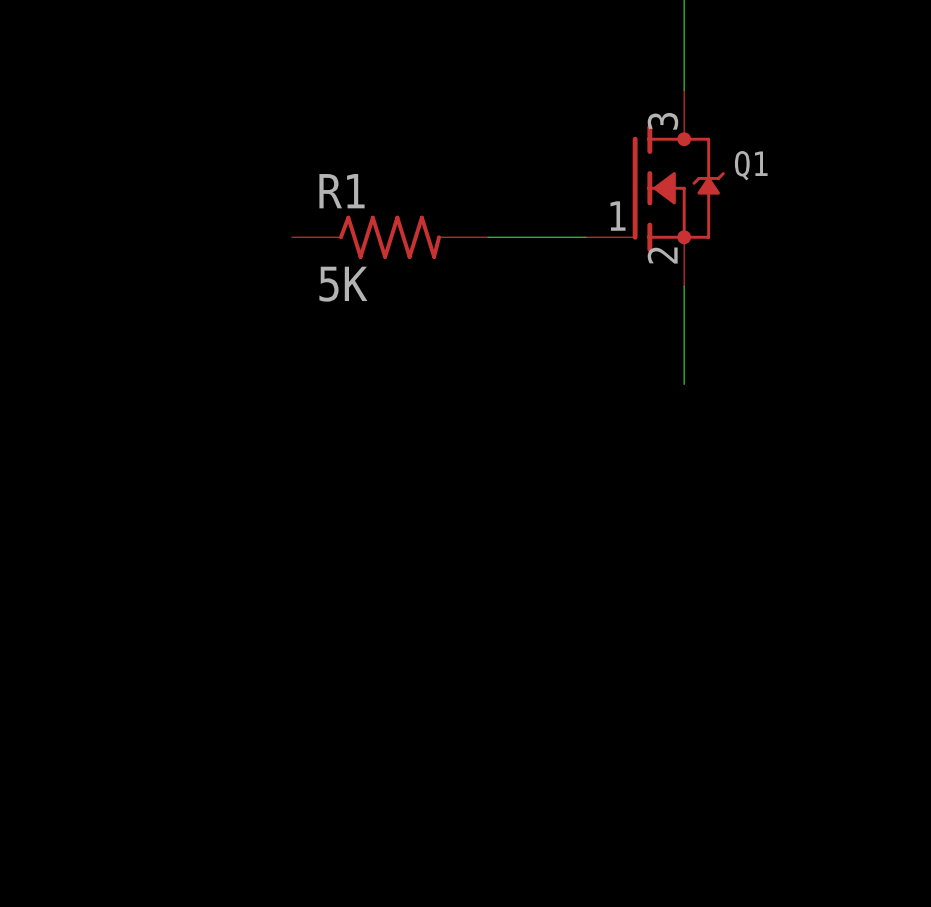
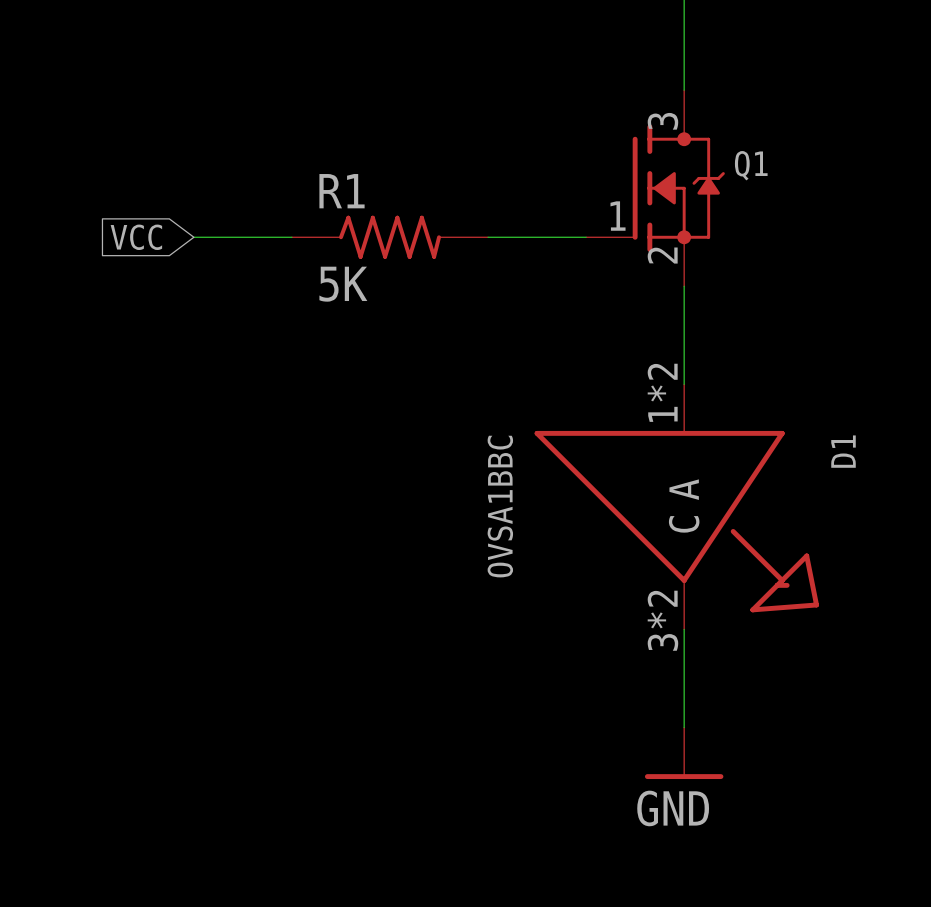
global label: none -> VCC (136, 237)
wire: none -> (193, 237) (291, 237)
D1: none -> OVSA1BBC (676, 506)
wire: none -> (684, 629) (684, 727)
power symbol: none -> GND (684, 753)

